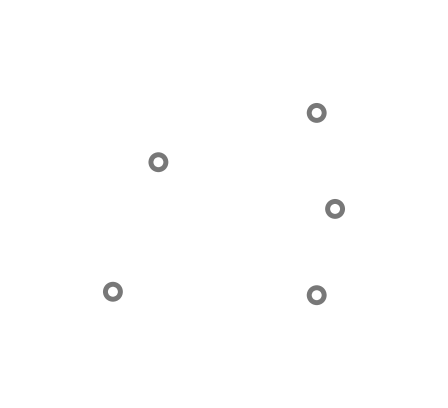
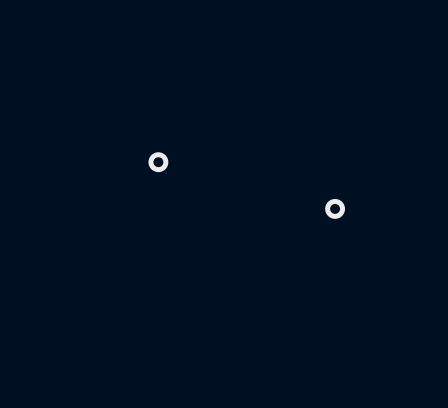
via: (316, 112) -> none
via: (112, 291) -> none
via: (316, 295) -> none

